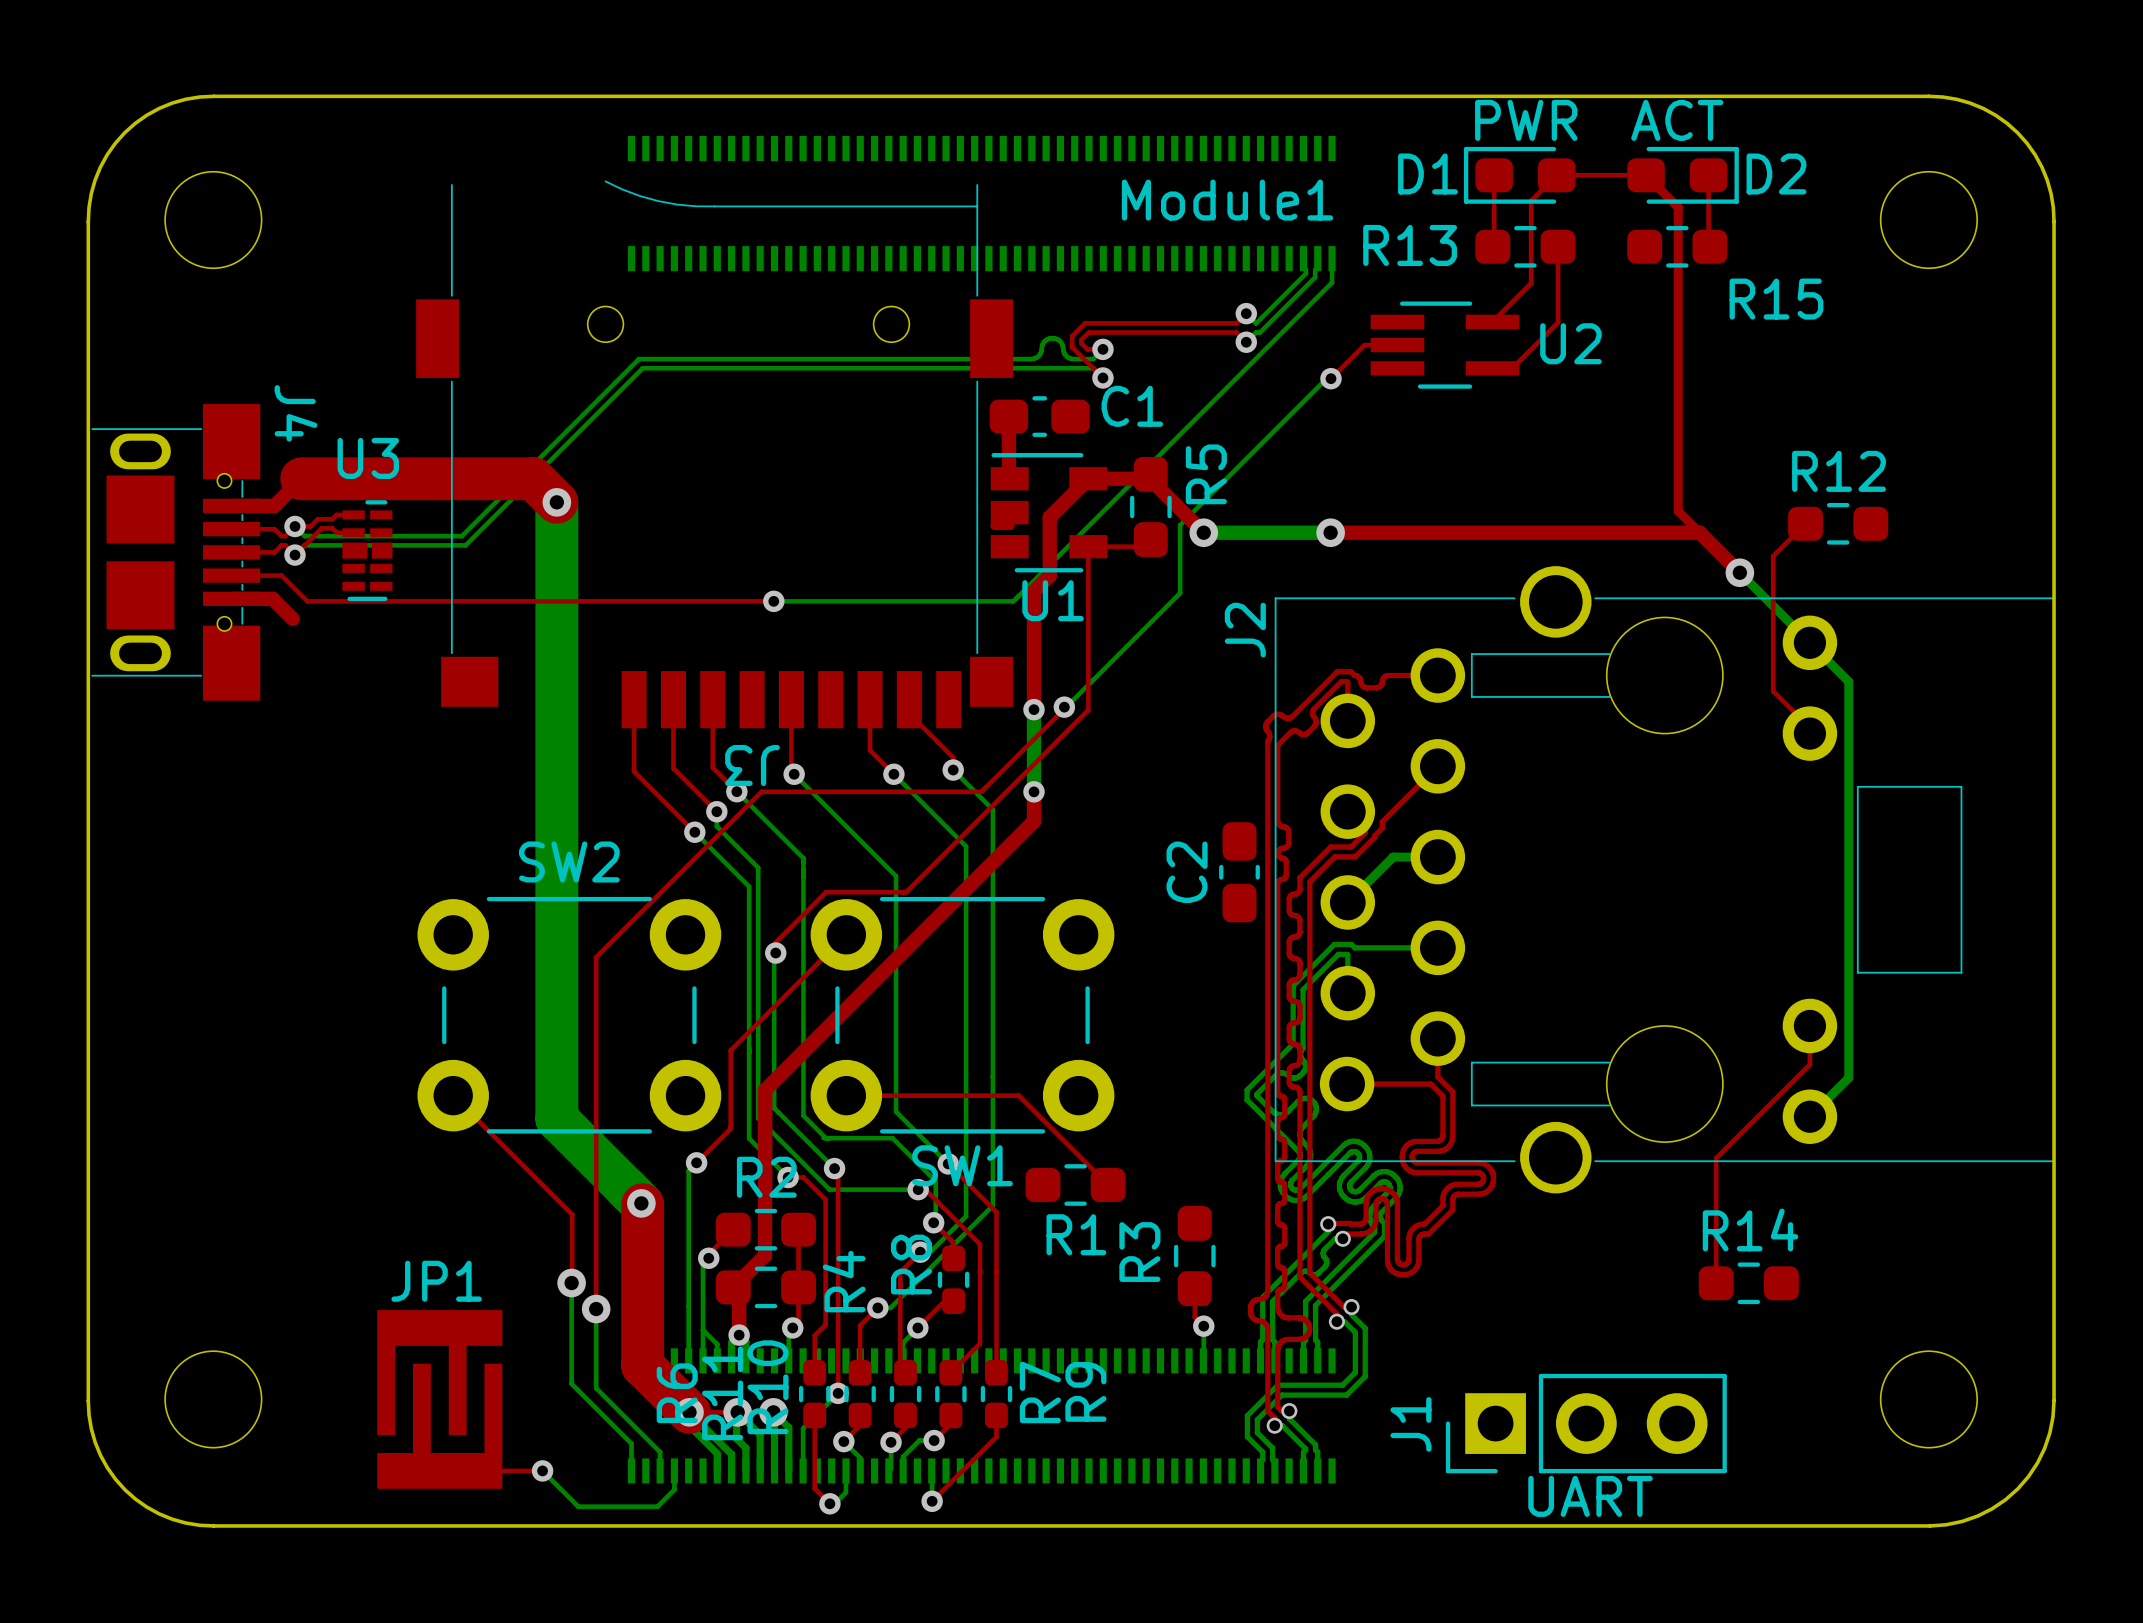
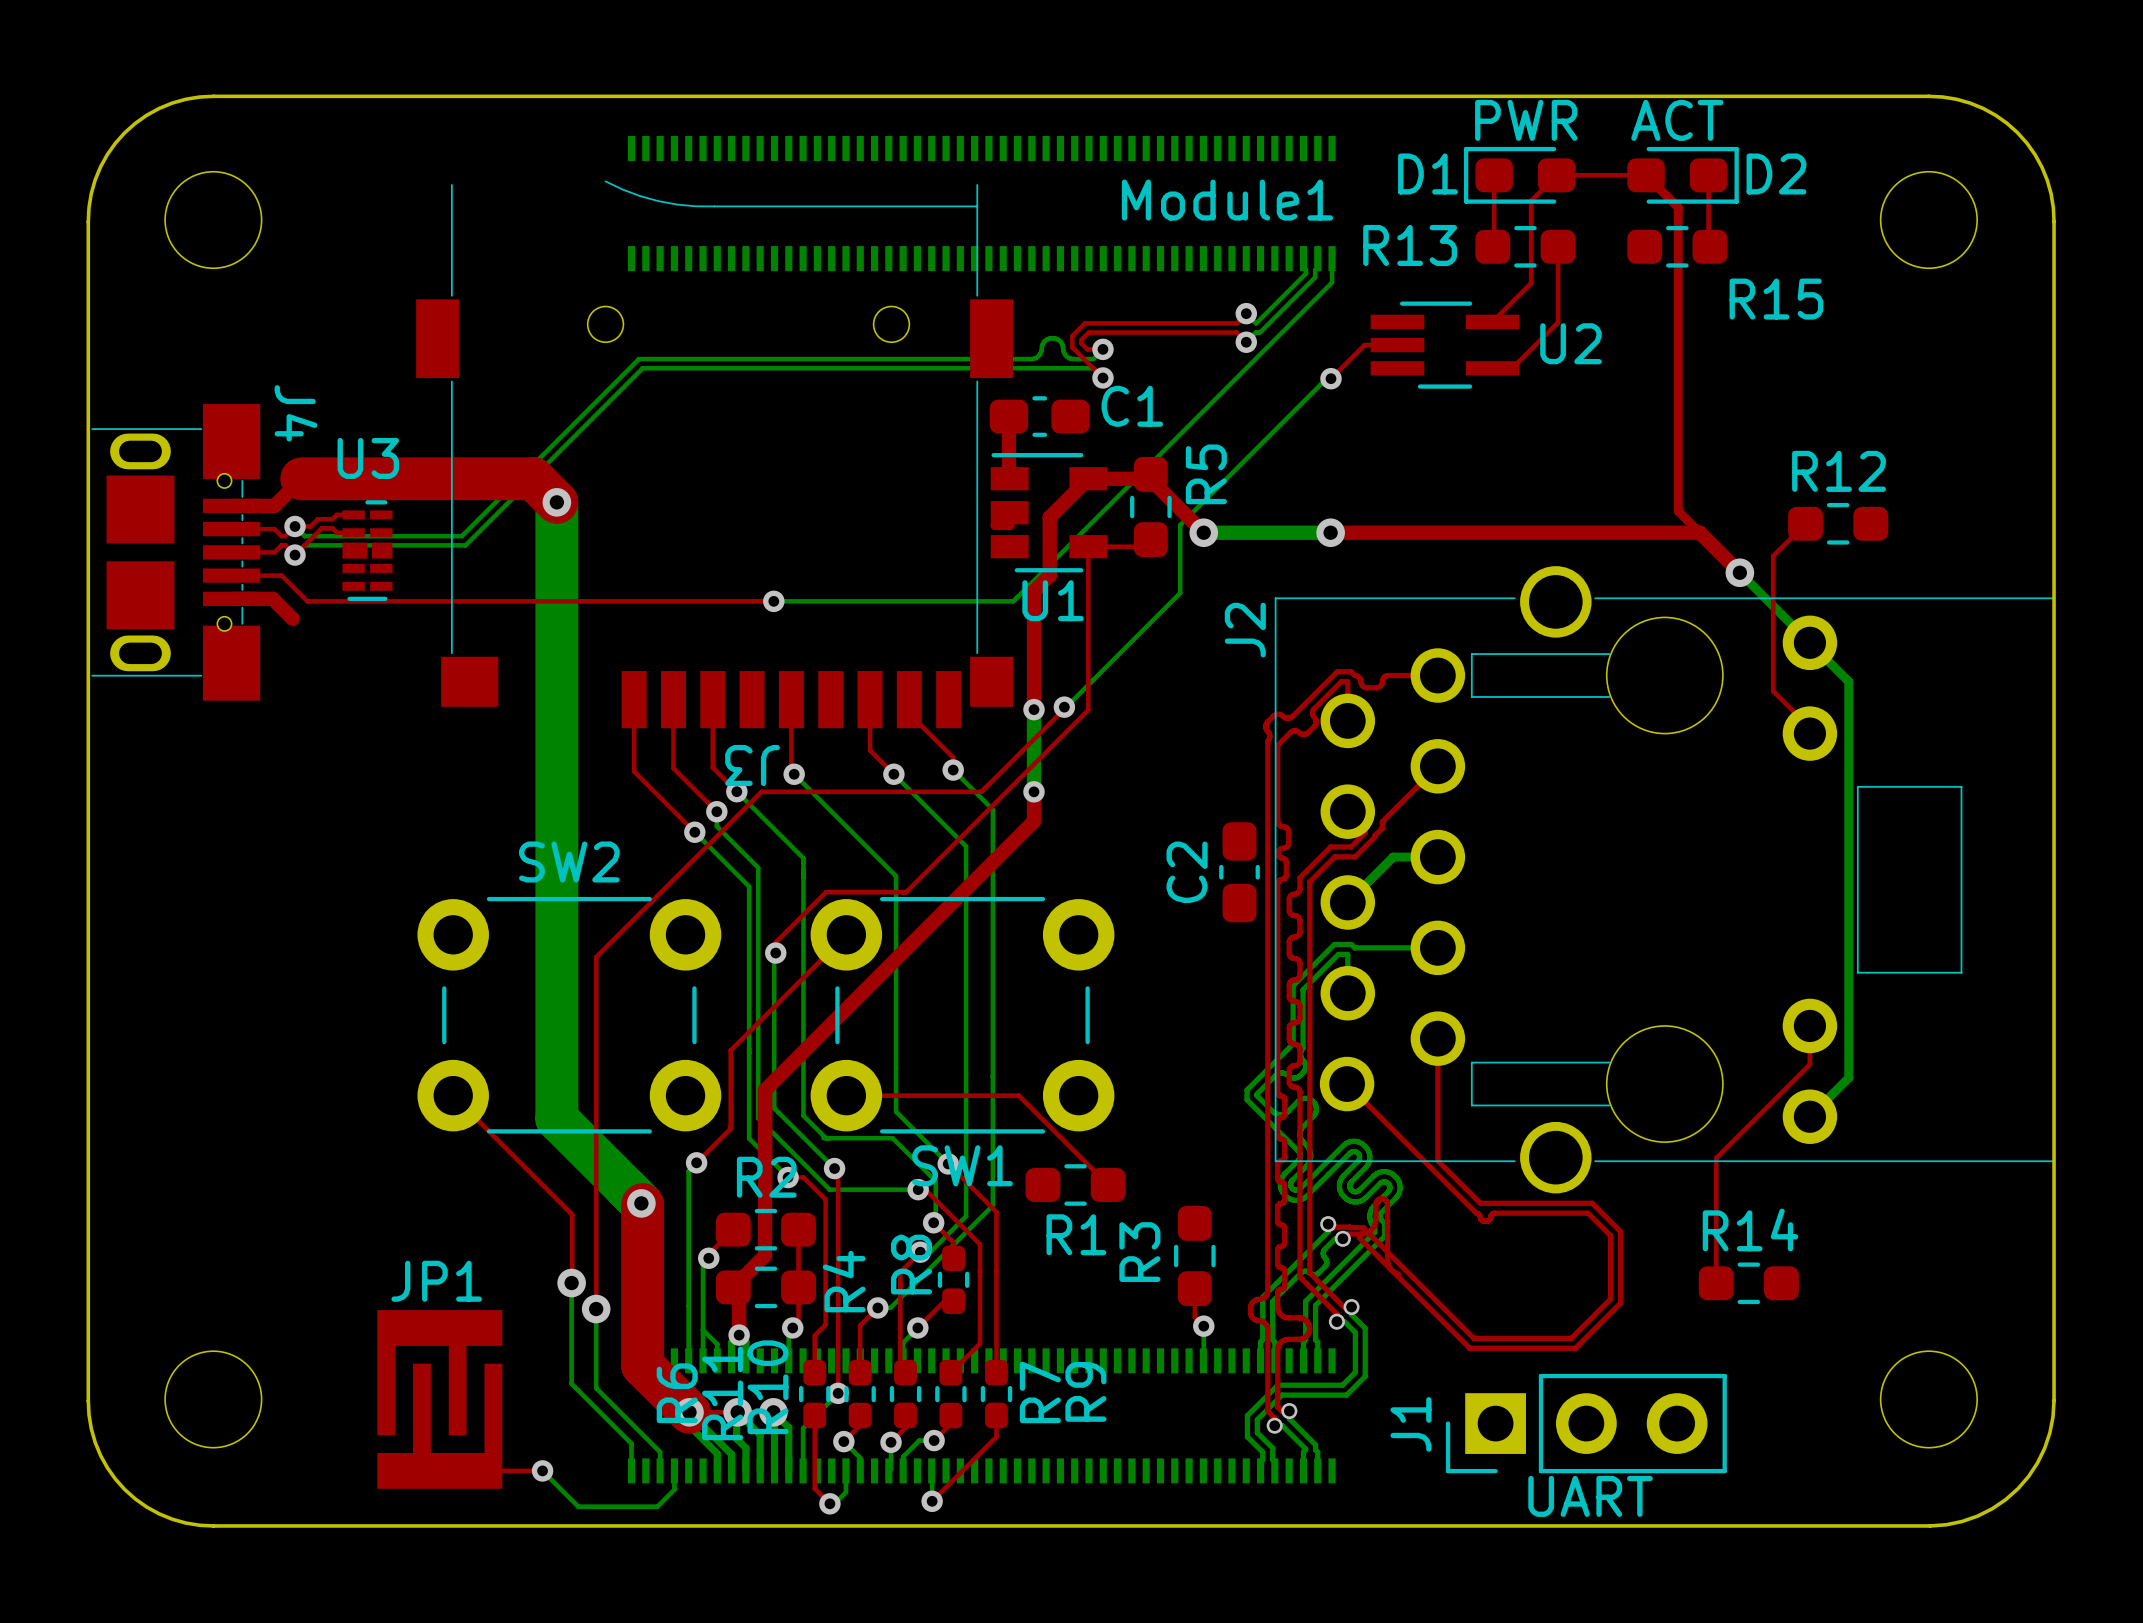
top track: (1437, 1077) (1452, 1091) (1452, 1139) (1449, 1145) (1441, 1150) (1415, 1151) (1412, 1154) (1412, 1159) (1417, 1162) (1482, 1163) (1492, 1171) (1493, 1182) (1490, 1188) (1482, 1193) (1454, 1195) (1452, 1198) (1452, 1209) (1428, 1234) (1422, 1234) (1419, 1237) (1418, 1263) (1415, 1269) (1407, 1274) (1398, 1274) -> (1437, 1077) (1437, 1160) (1480, 1203) (1592, 1203) (1620, 1231) (1620, 1303) (1575, 1348) (1469, 1348) (1393, 1271)
top track: (1347, 1084) (1430, 1084) (1442, 1096) (1442, 1136) (1438, 1141) (1417, 1141) (1407, 1144) (1402, 1152) (1403, 1164) (1413, 1172) (1479, 1172) (1483, 1176) (1483, 1179) (1479, 1184) (1454, 1184) (1446, 1189) (1443, 1195) (1442, 1205) (1424, 1224) (1417, 1225) (1410, 1232) (1408, 1260) (1404, 1264) (1400, 1264) (1397, 1260) (1397, 1200) (1389, 1190) (1377, 1189) (1369, 1194) (1366, 1200) (1365, 1219) (1362, 1223) (1328, 1224) -> (1347, 1084) (1479, 1214) (1482, 1220) (1488, 1220) (1494, 1213) (1588, 1213) (1610, 1235) (1610, 1299) (1571, 1338) (1473, 1338) (1363, 1227) (1328, 1227)

